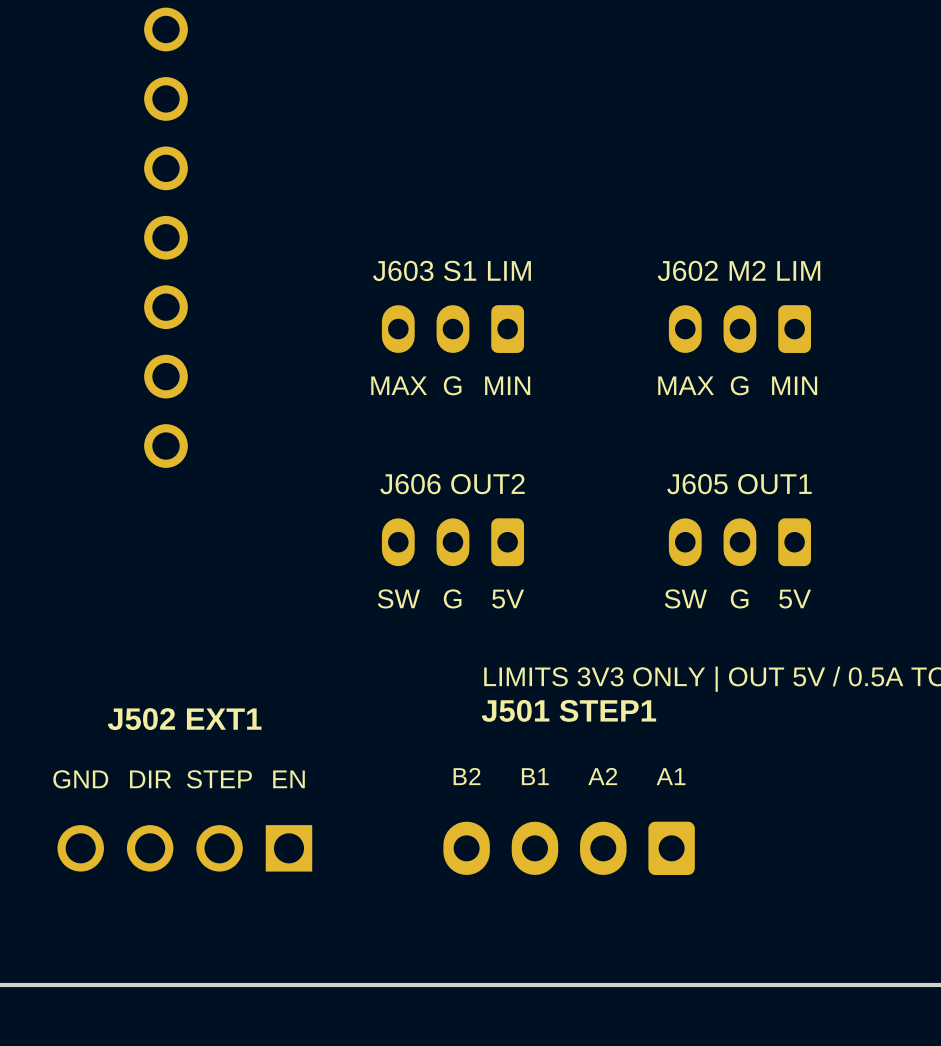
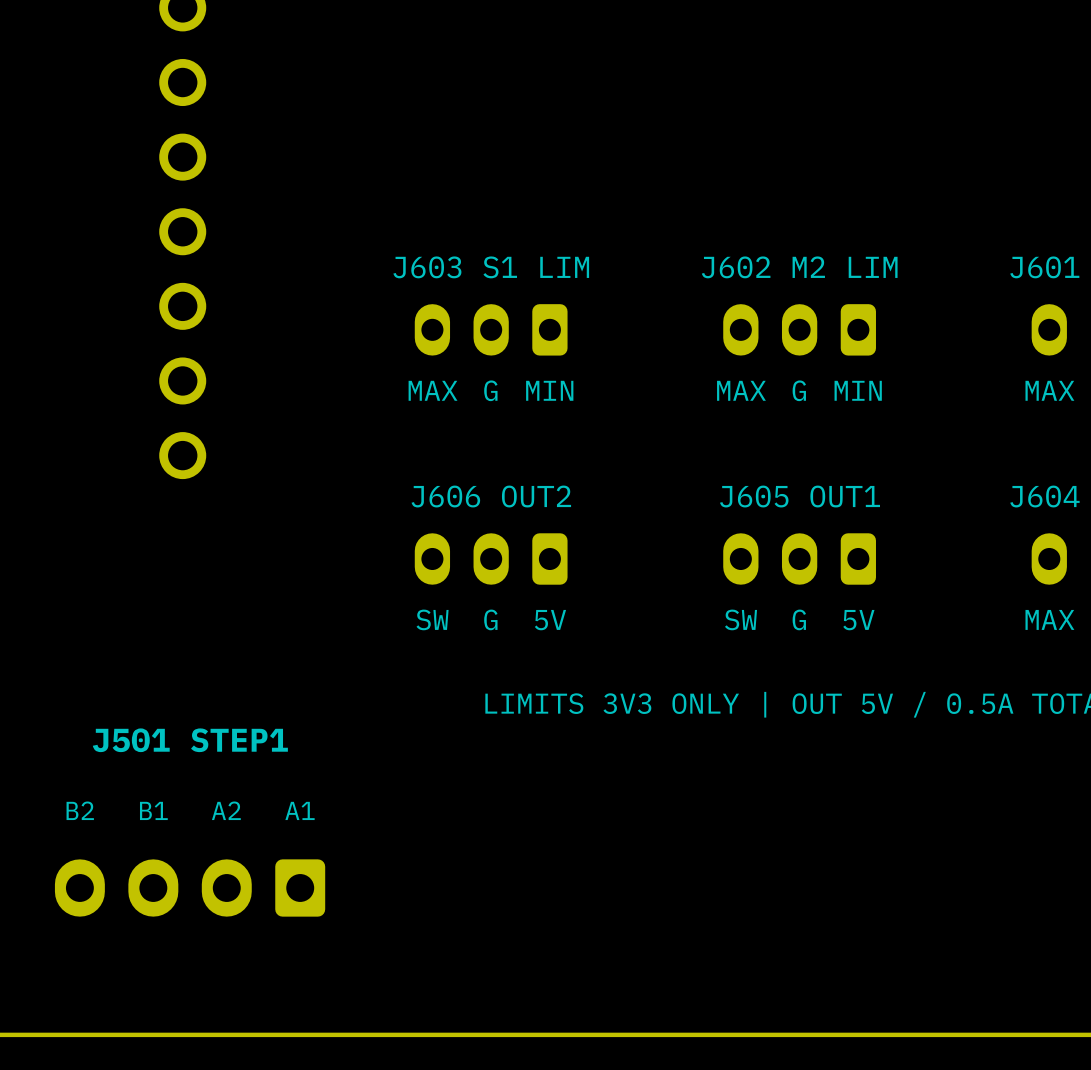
text: J501 STEP1 (568, 710) -> none
text: J502 EXT1 (184, 719) -> J501 STEP1 (190, 740)
text: B2 (467, 776) -> none
text: B1 (535, 776) -> none
text: A2 (602, 776) -> none
text: A1 (671, 776) -> none
text: GND (80, 779) -> B2 (80, 810)
text: DIR (150, 779) -> B1 (153, 810)
text: STEP (219, 779) -> A2 (226, 810)
text: EN (288, 779) -> A1 (300, 810)
part footprint: [57, 825, 313, 872] -> [54, 859, 326, 917]
part: (569, 848) -> none

